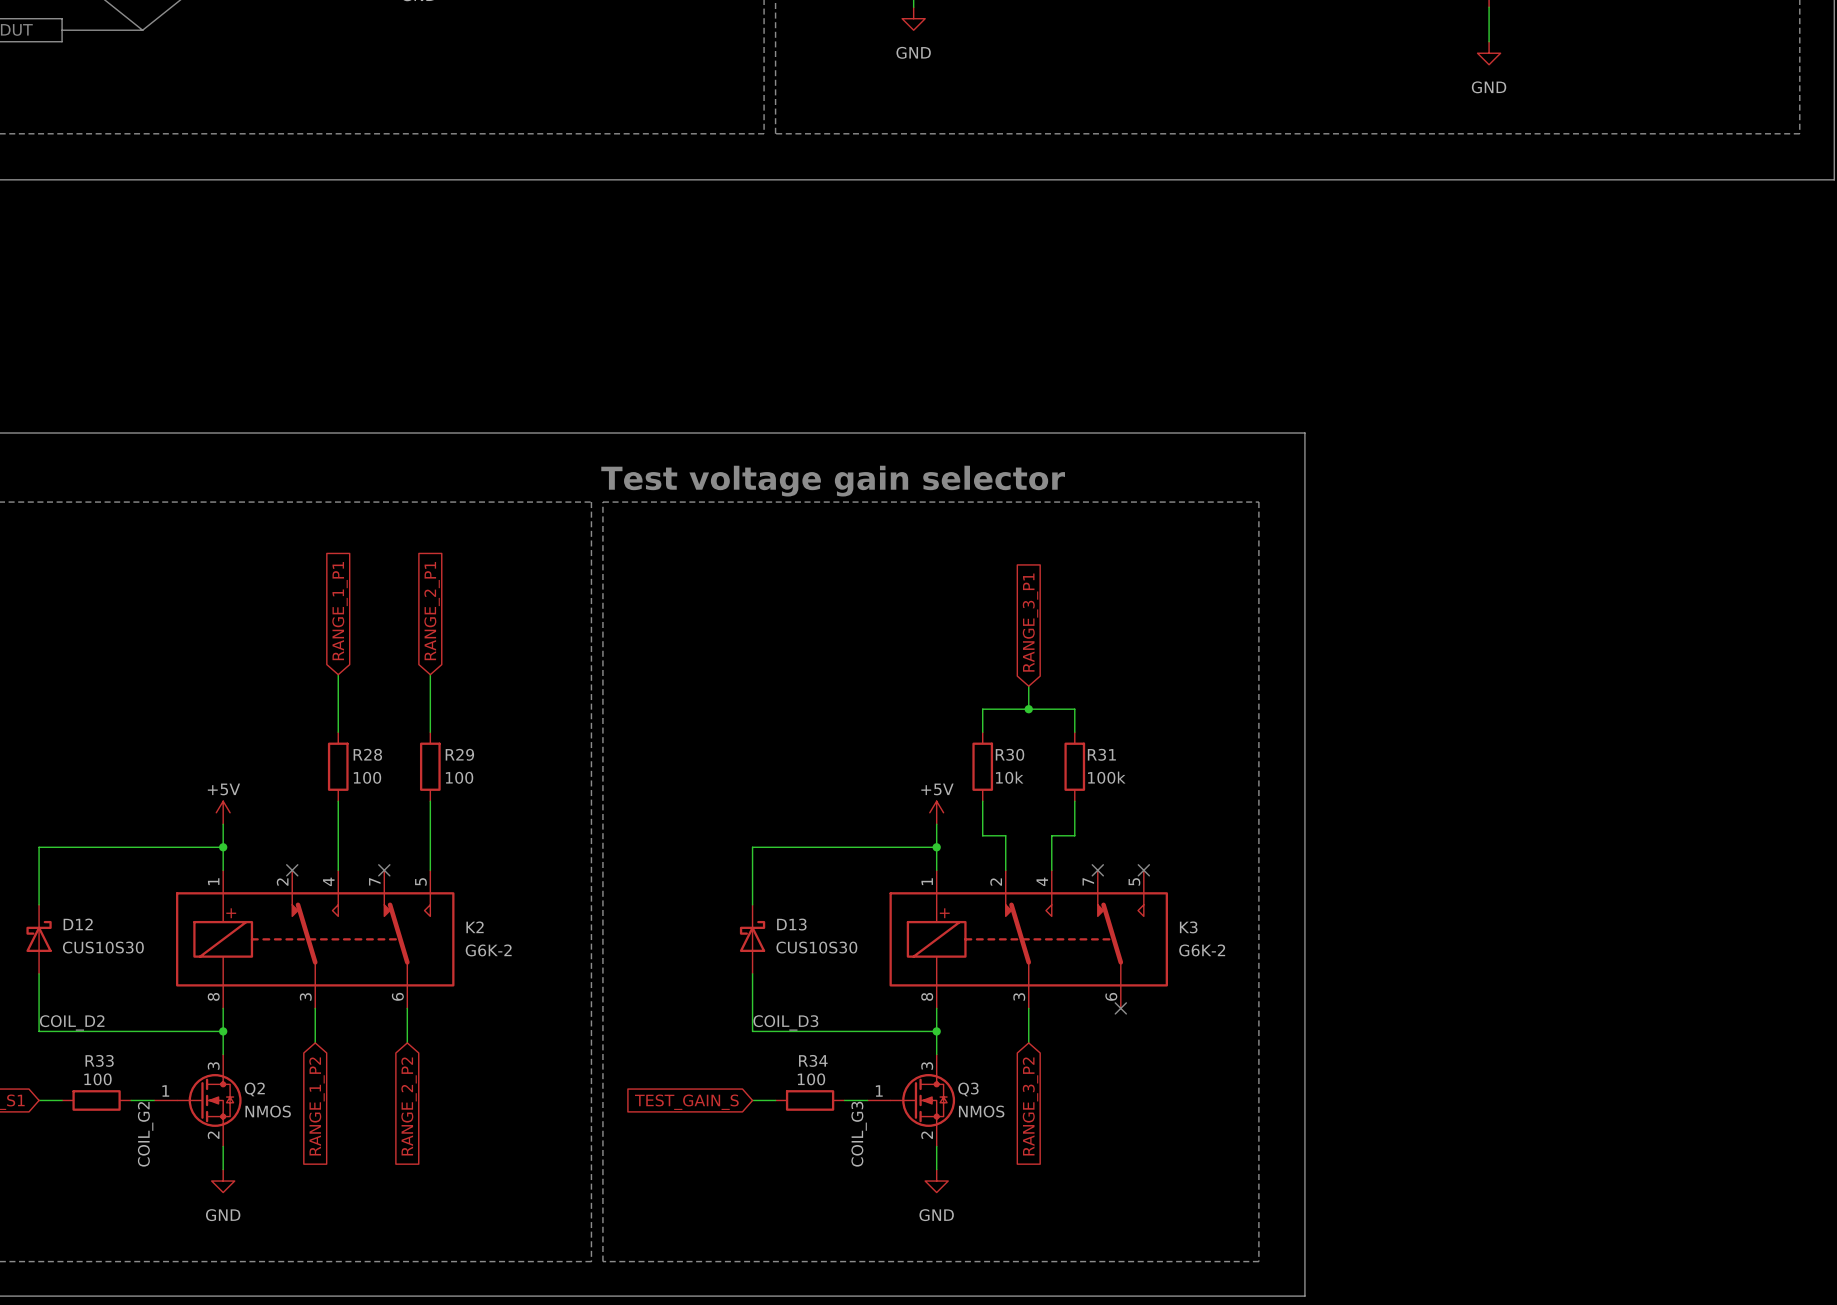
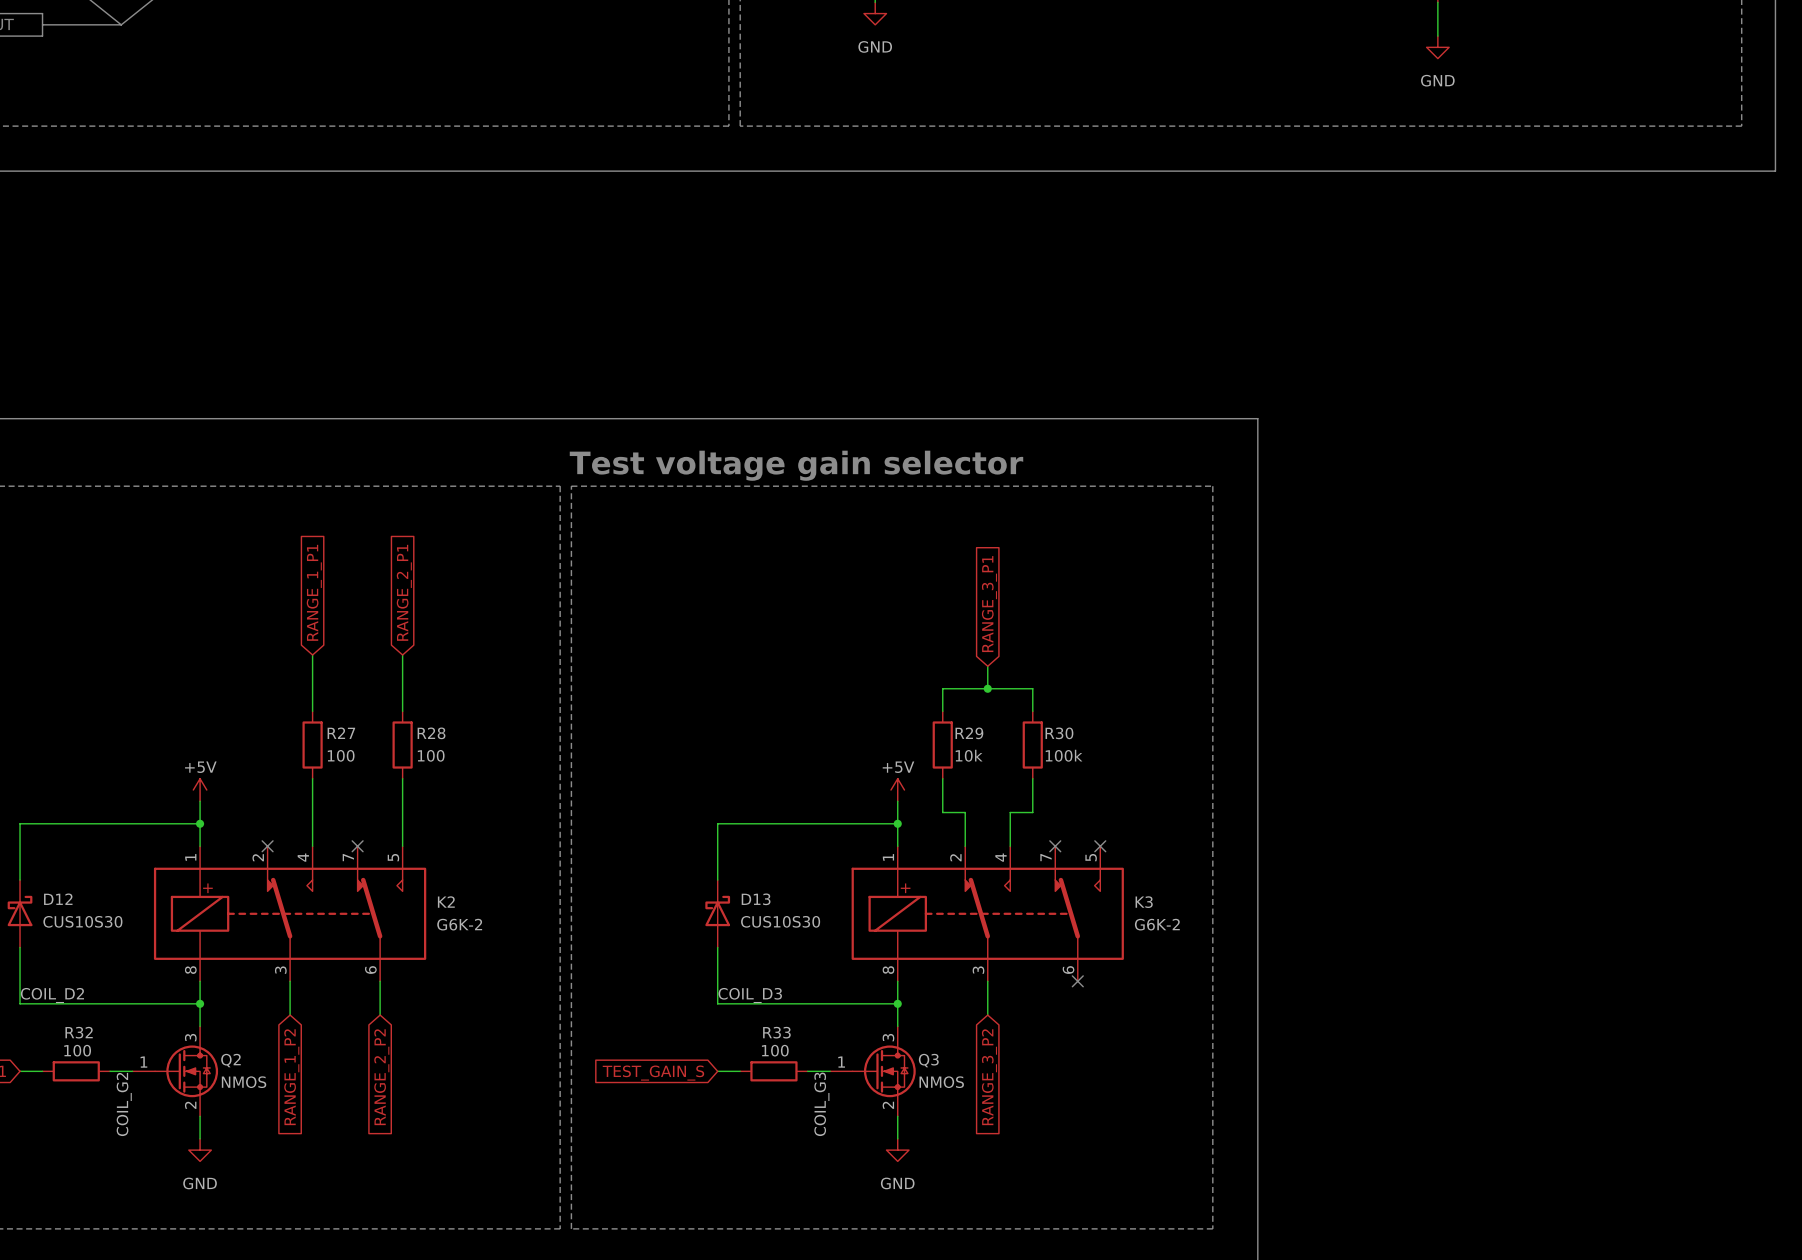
R28 name: R28 (367, 754) -> R27 (341, 733)
R29 name: R29 (459, 754) -> R28 (431, 733)
R30 name: R30 (1010, 754) -> R29 (969, 733)
R31 name: R31 (1101, 754) -> R30 (1059, 733)
R33 name: R33 (99, 1060) -> R32 (79, 1032)
R34 name: R34 (813, 1060) -> R33 (776, 1032)

